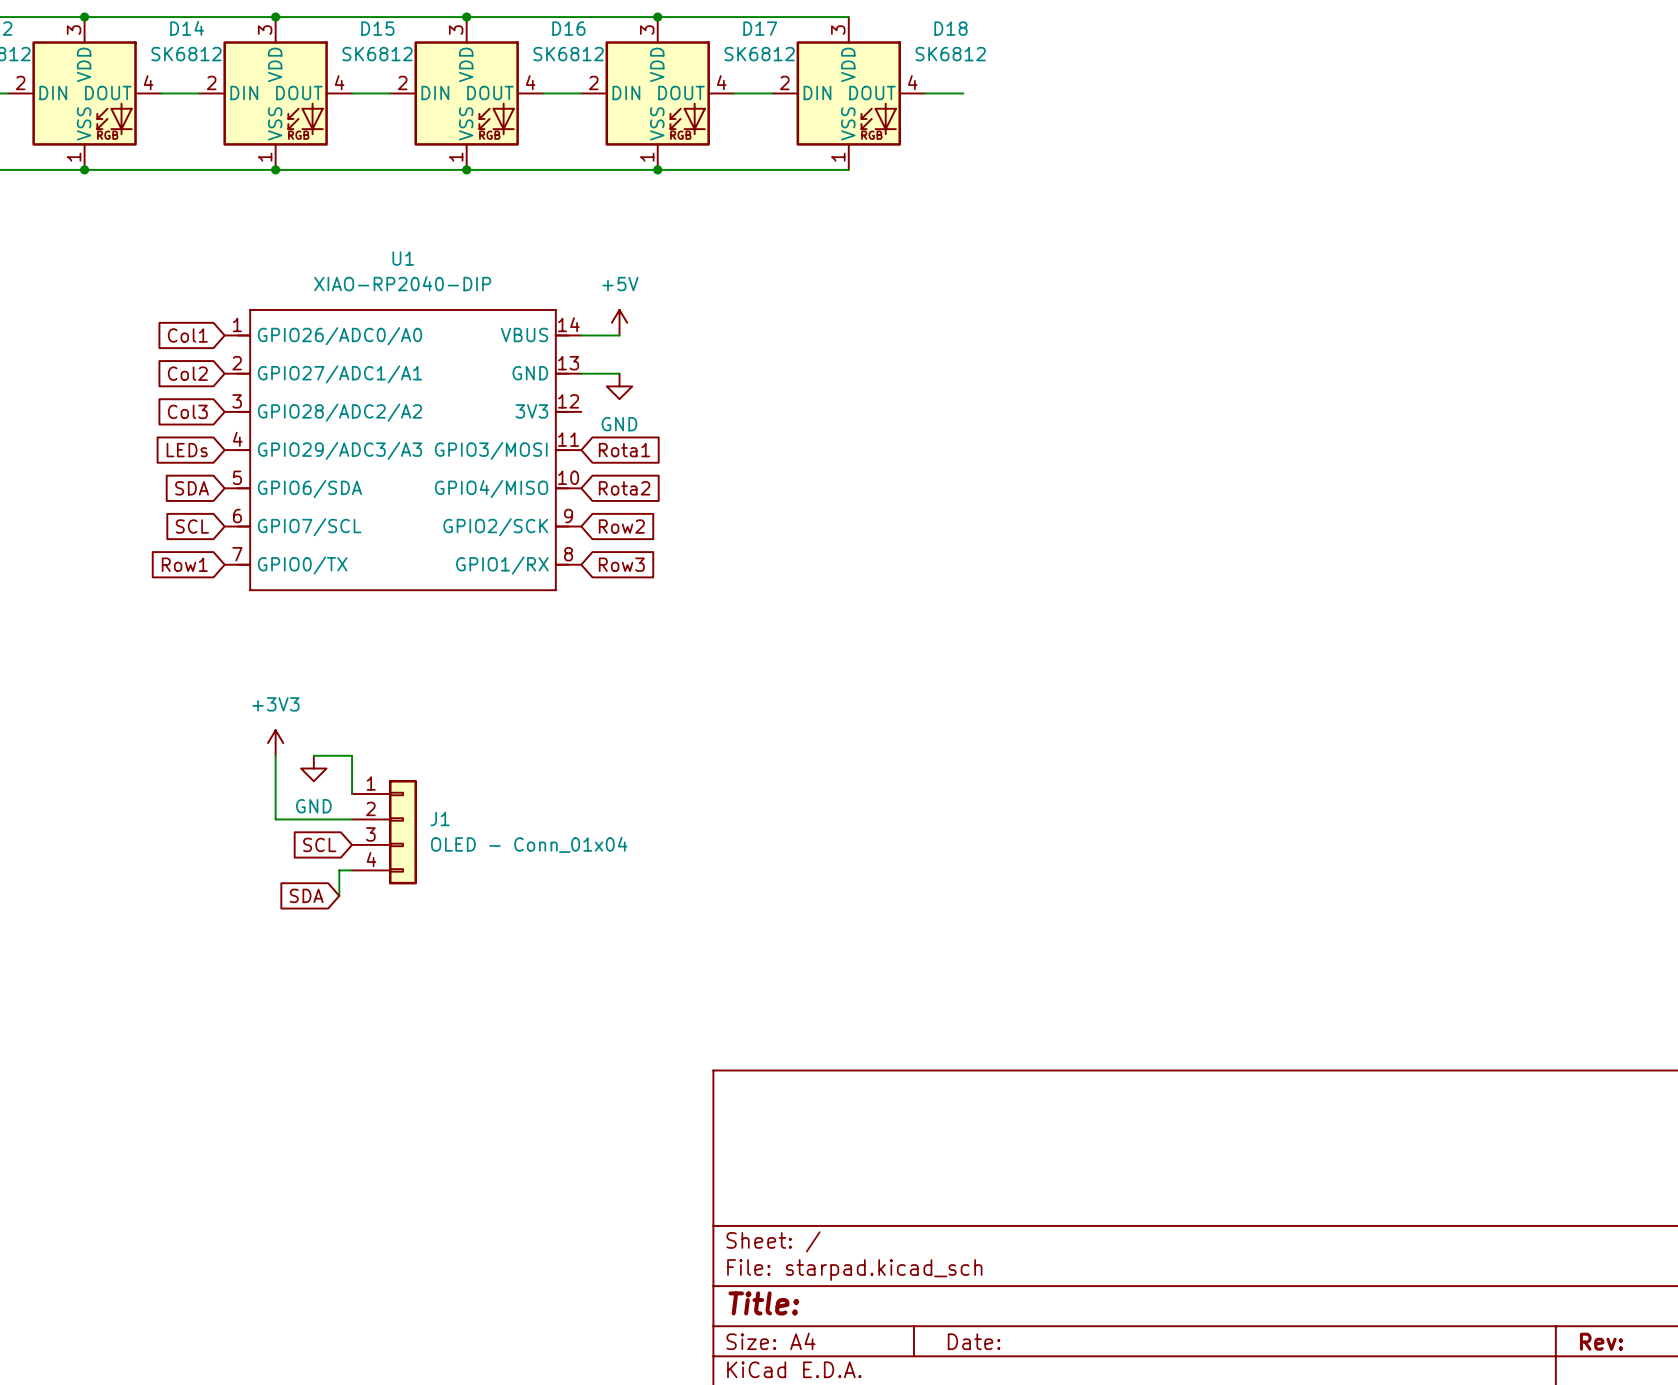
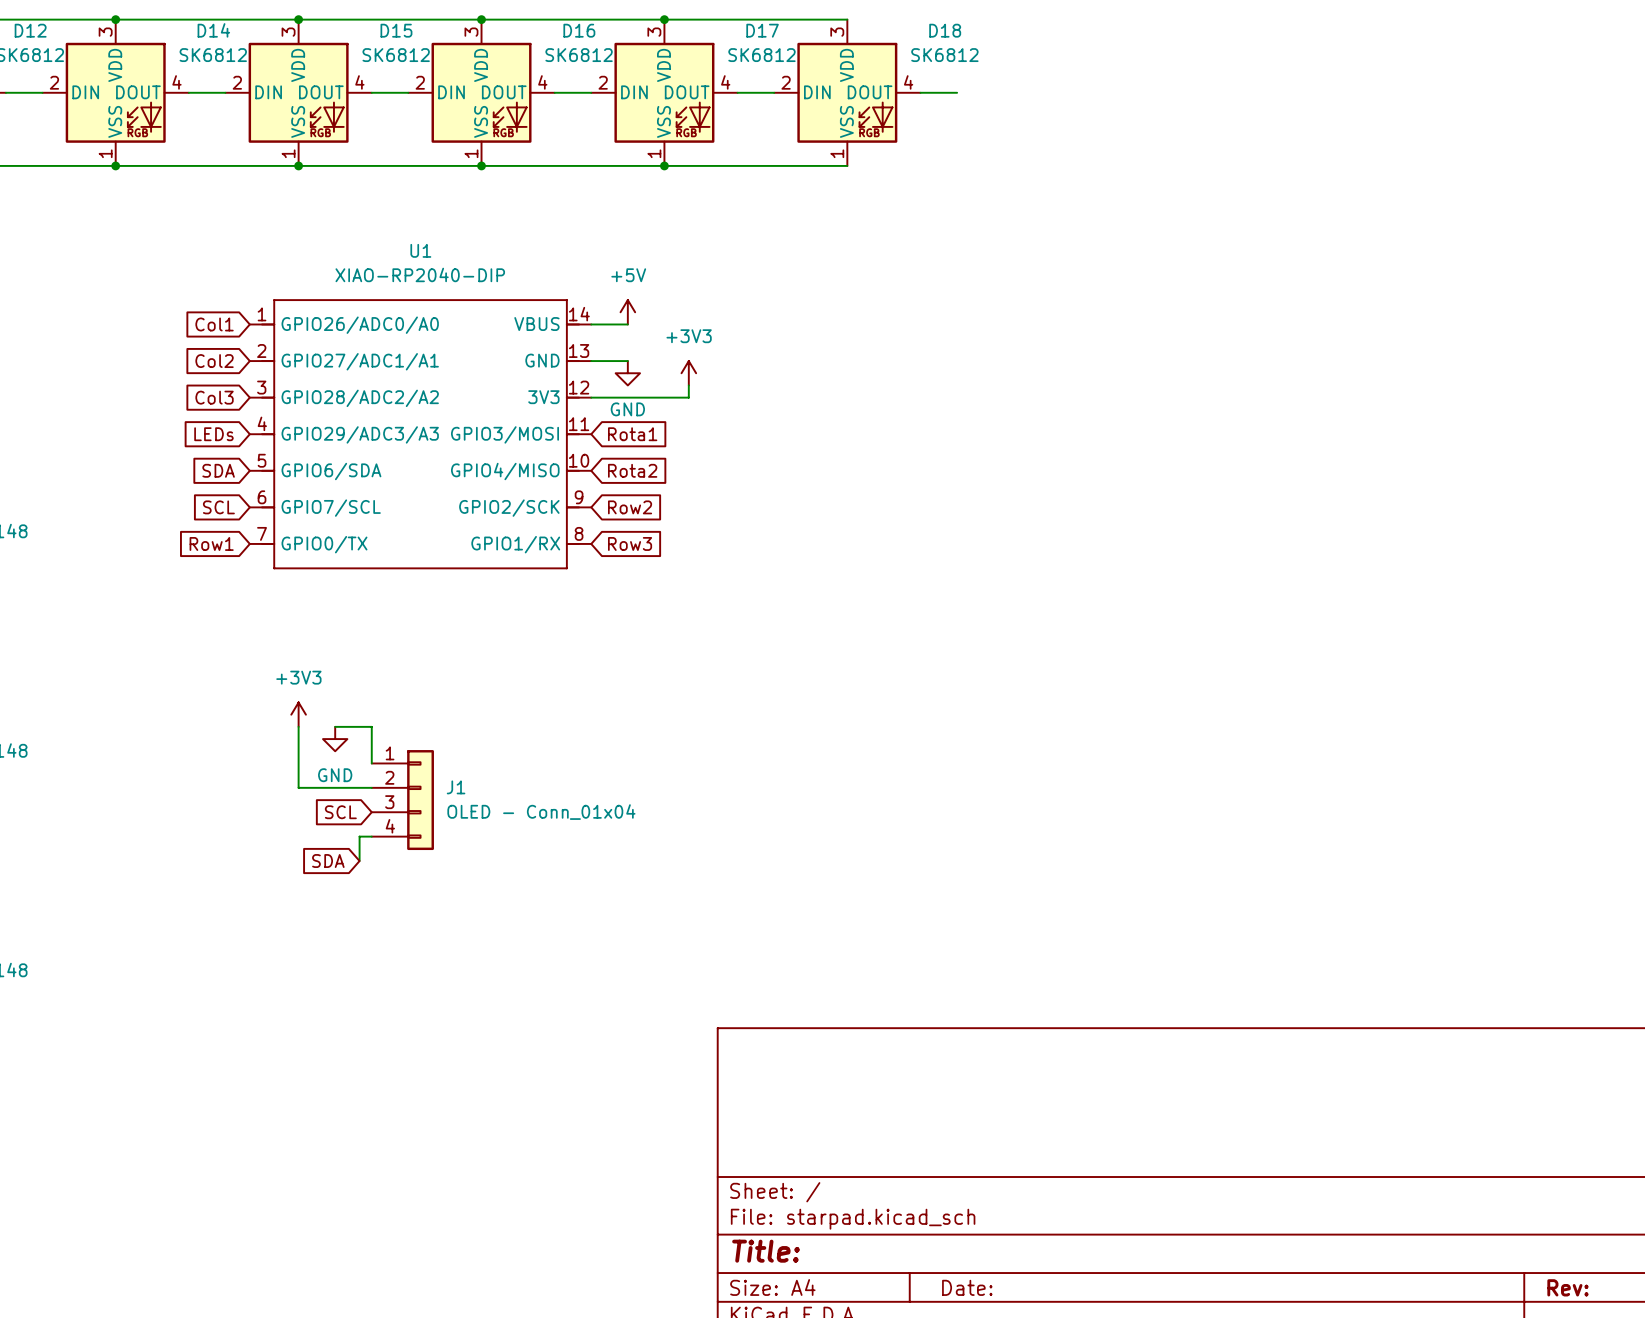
power symbol: none -> +3V3 (688, 373)
wire: none -> (688, 385) (688, 397) (591, 397)

